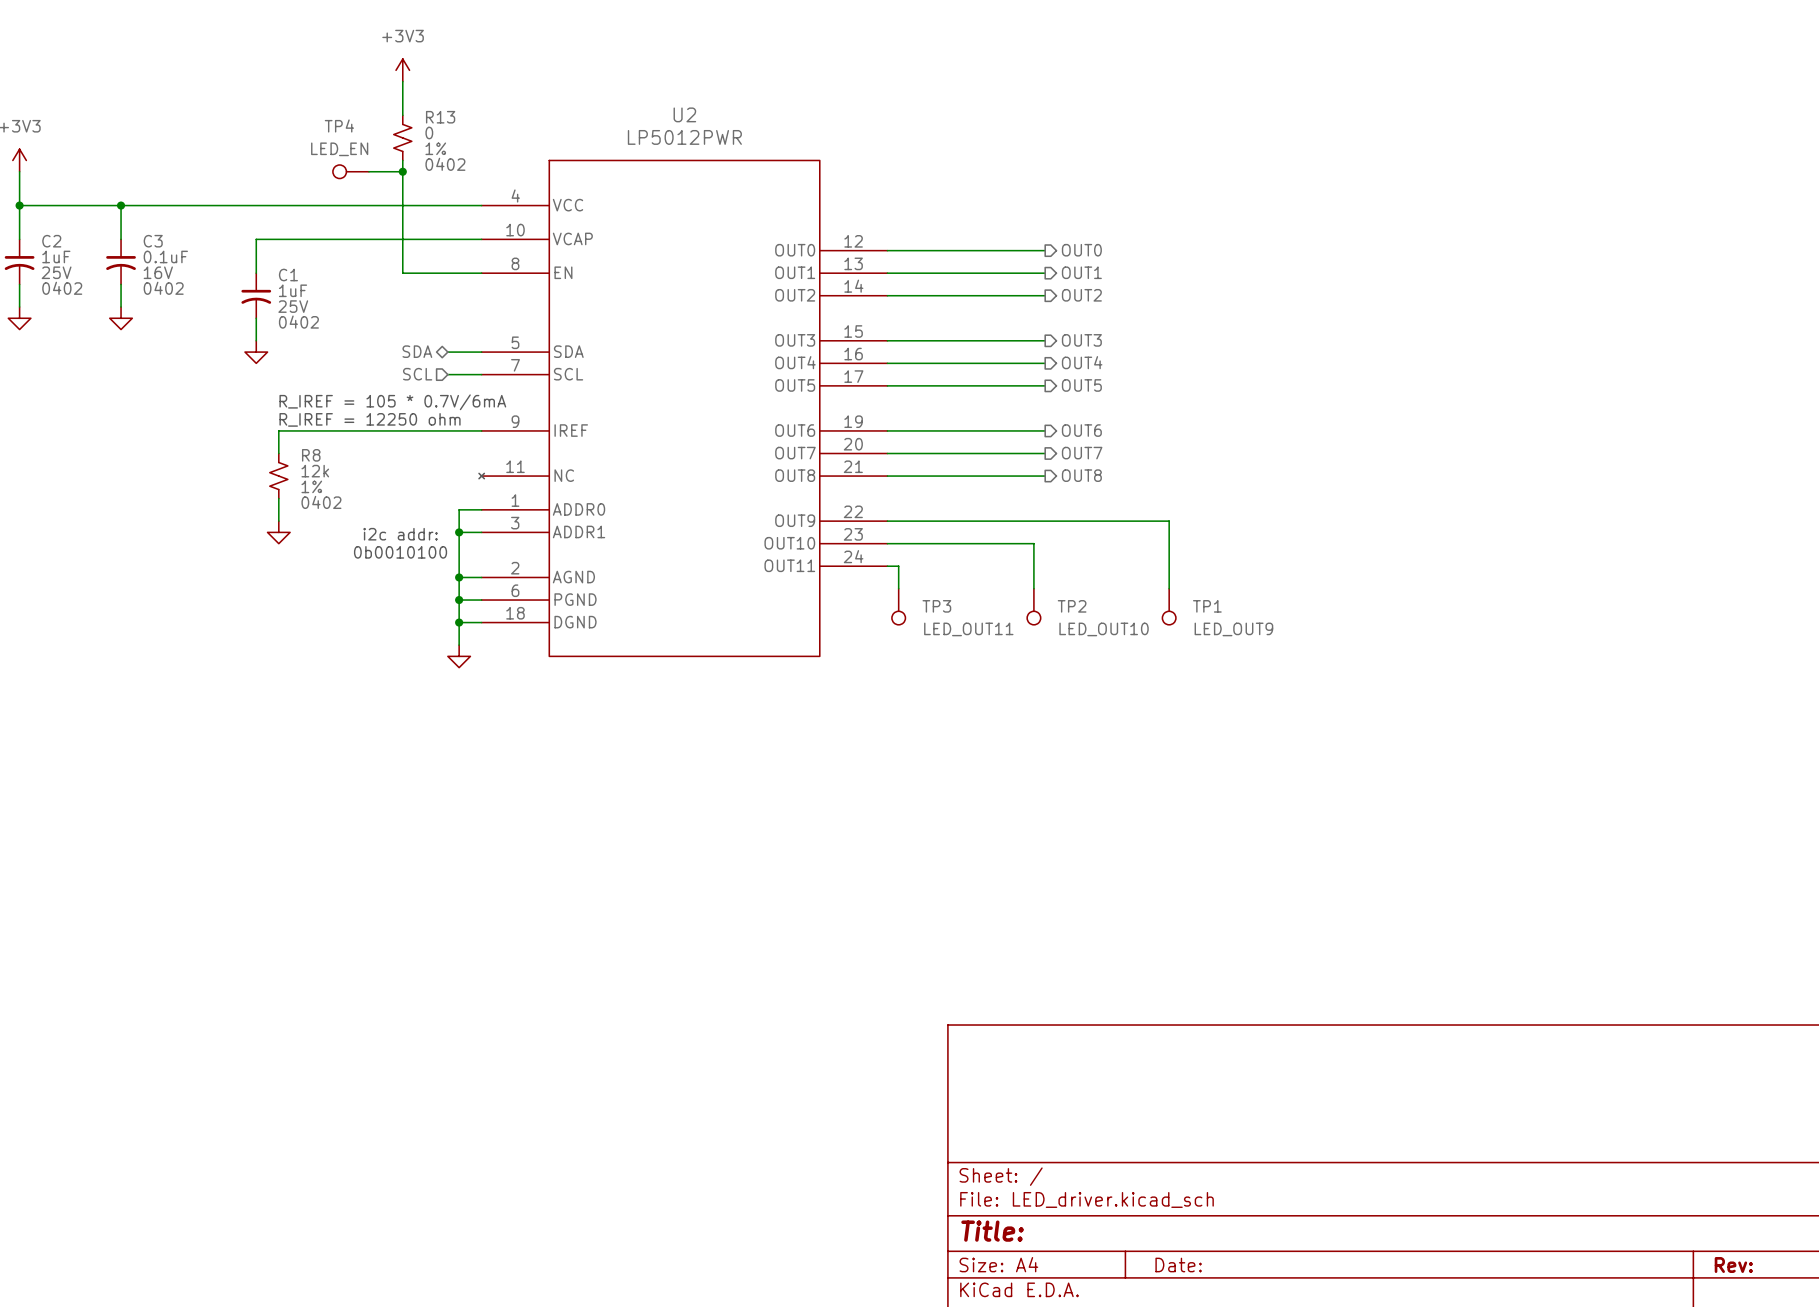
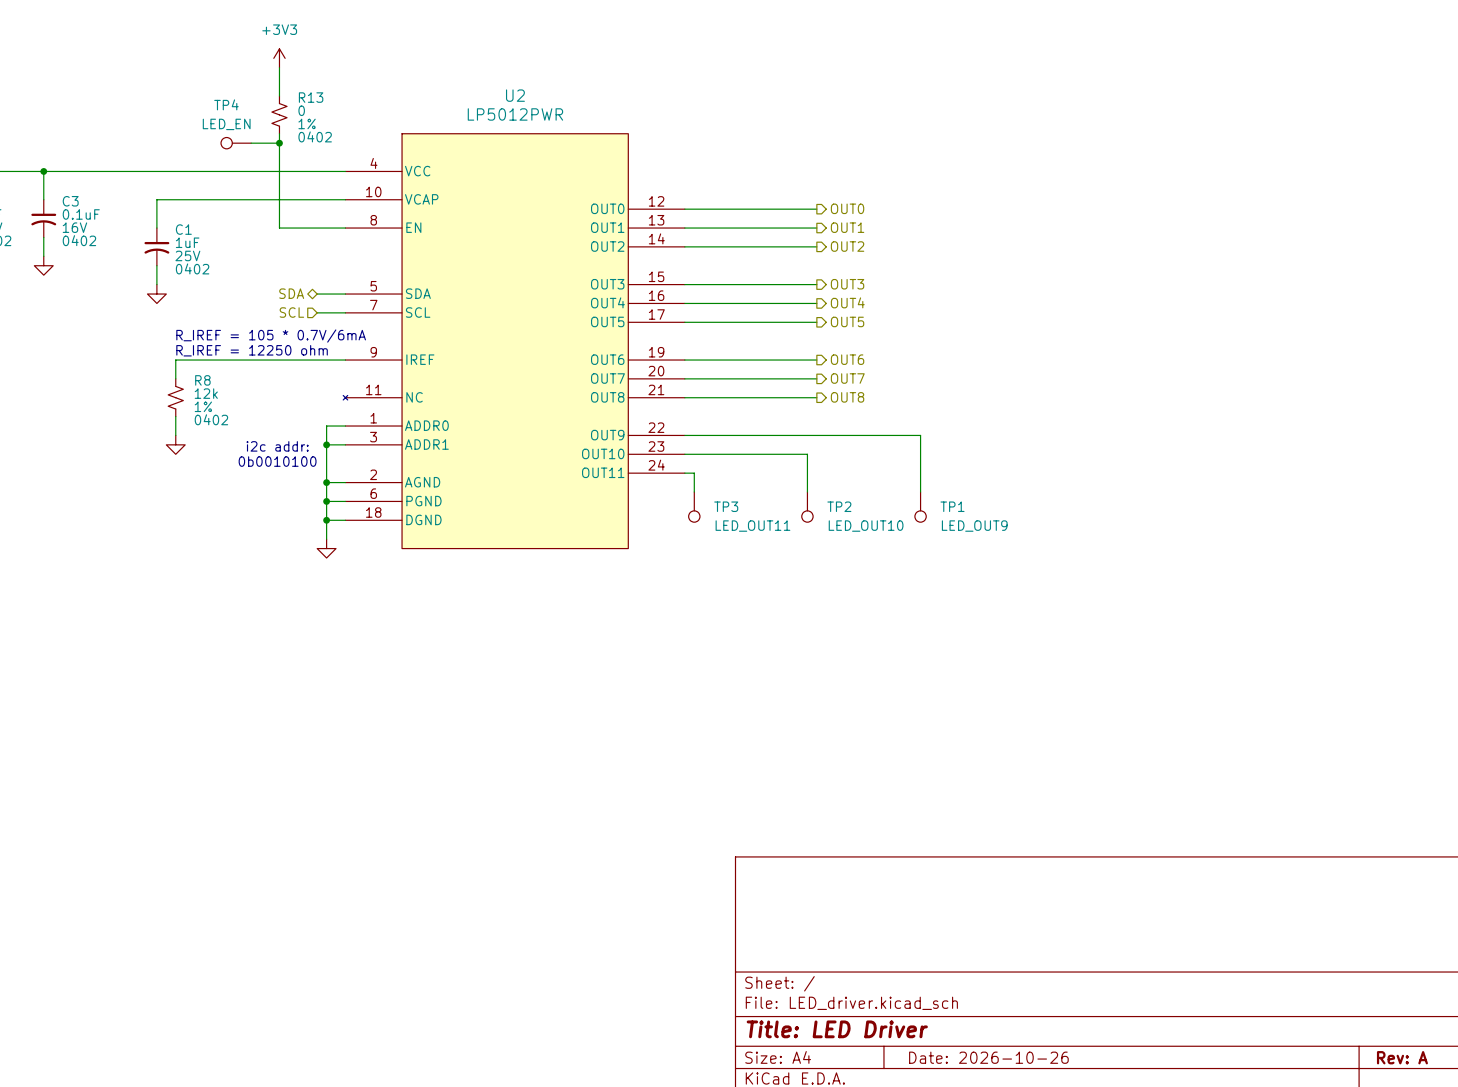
title block: Title: (992, 1231) -> Title: LED Driver (837, 1029)
title block: Date: (1178, 1265) -> Date: 2026-10-26 (988, 1057)
title block: Rev: (1733, 1265) -> Rev: A (1402, 1057)

